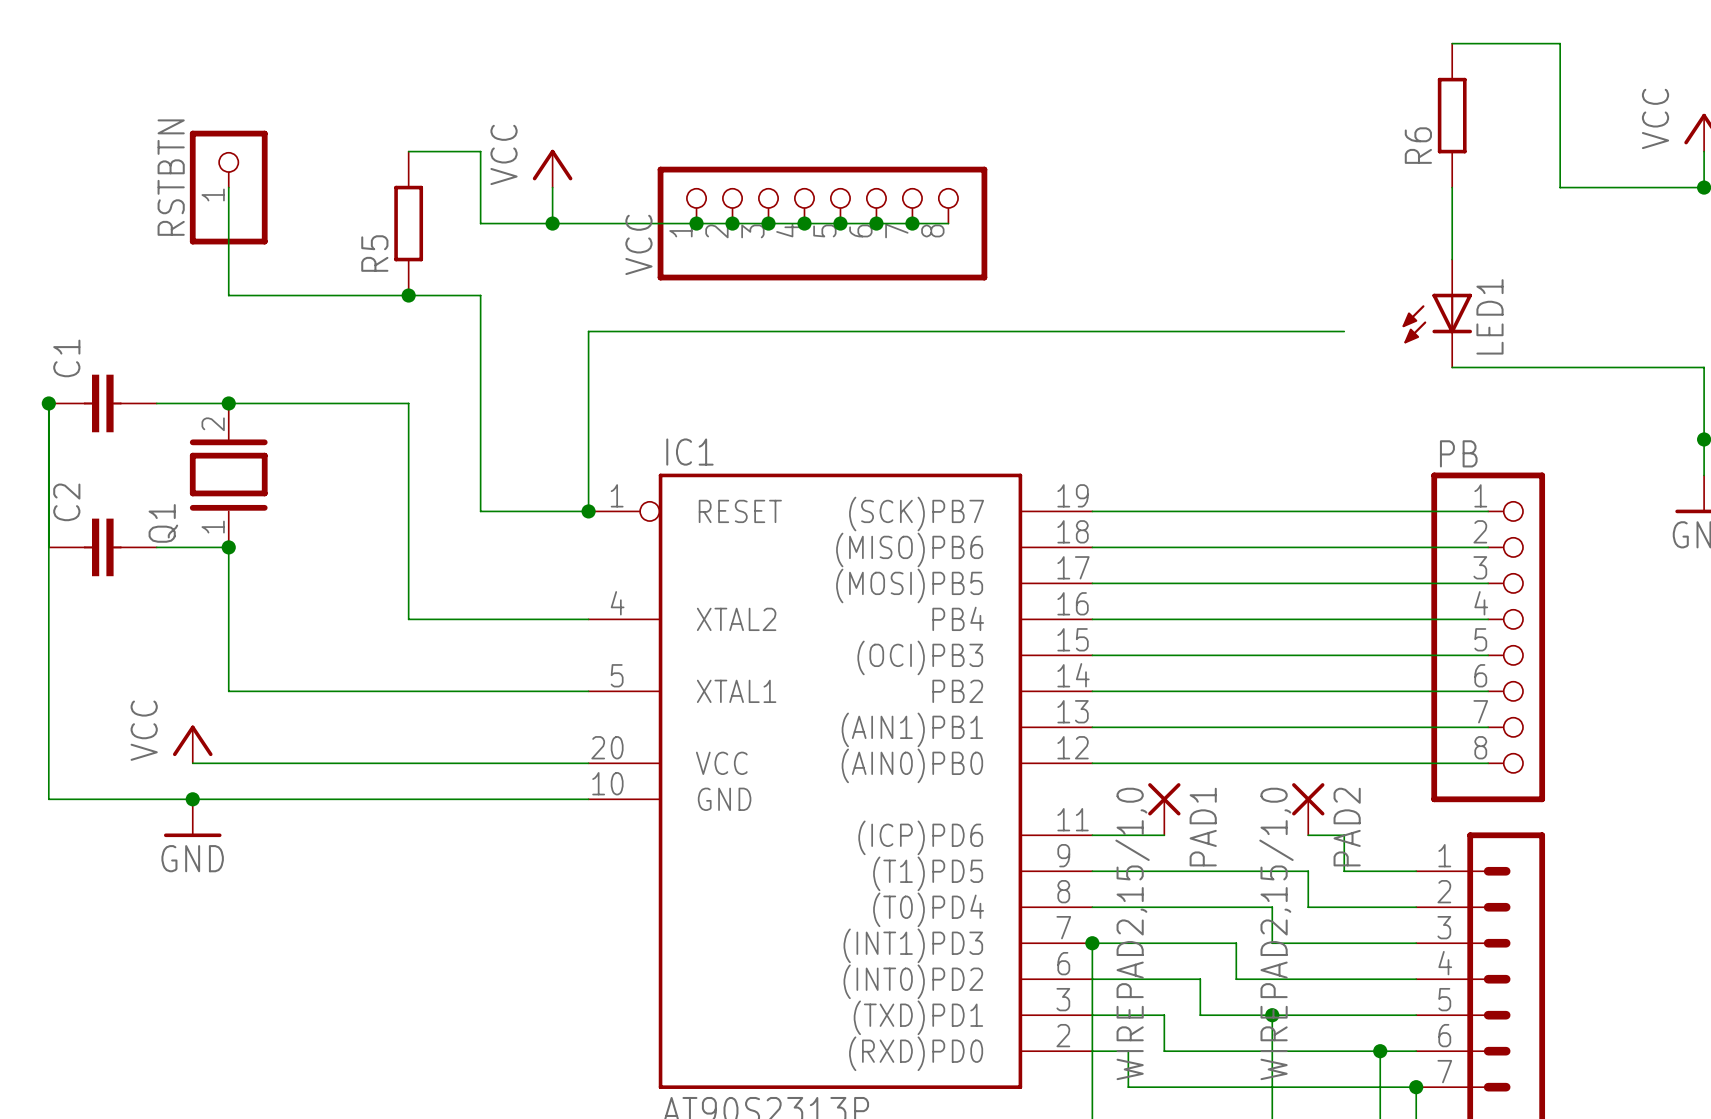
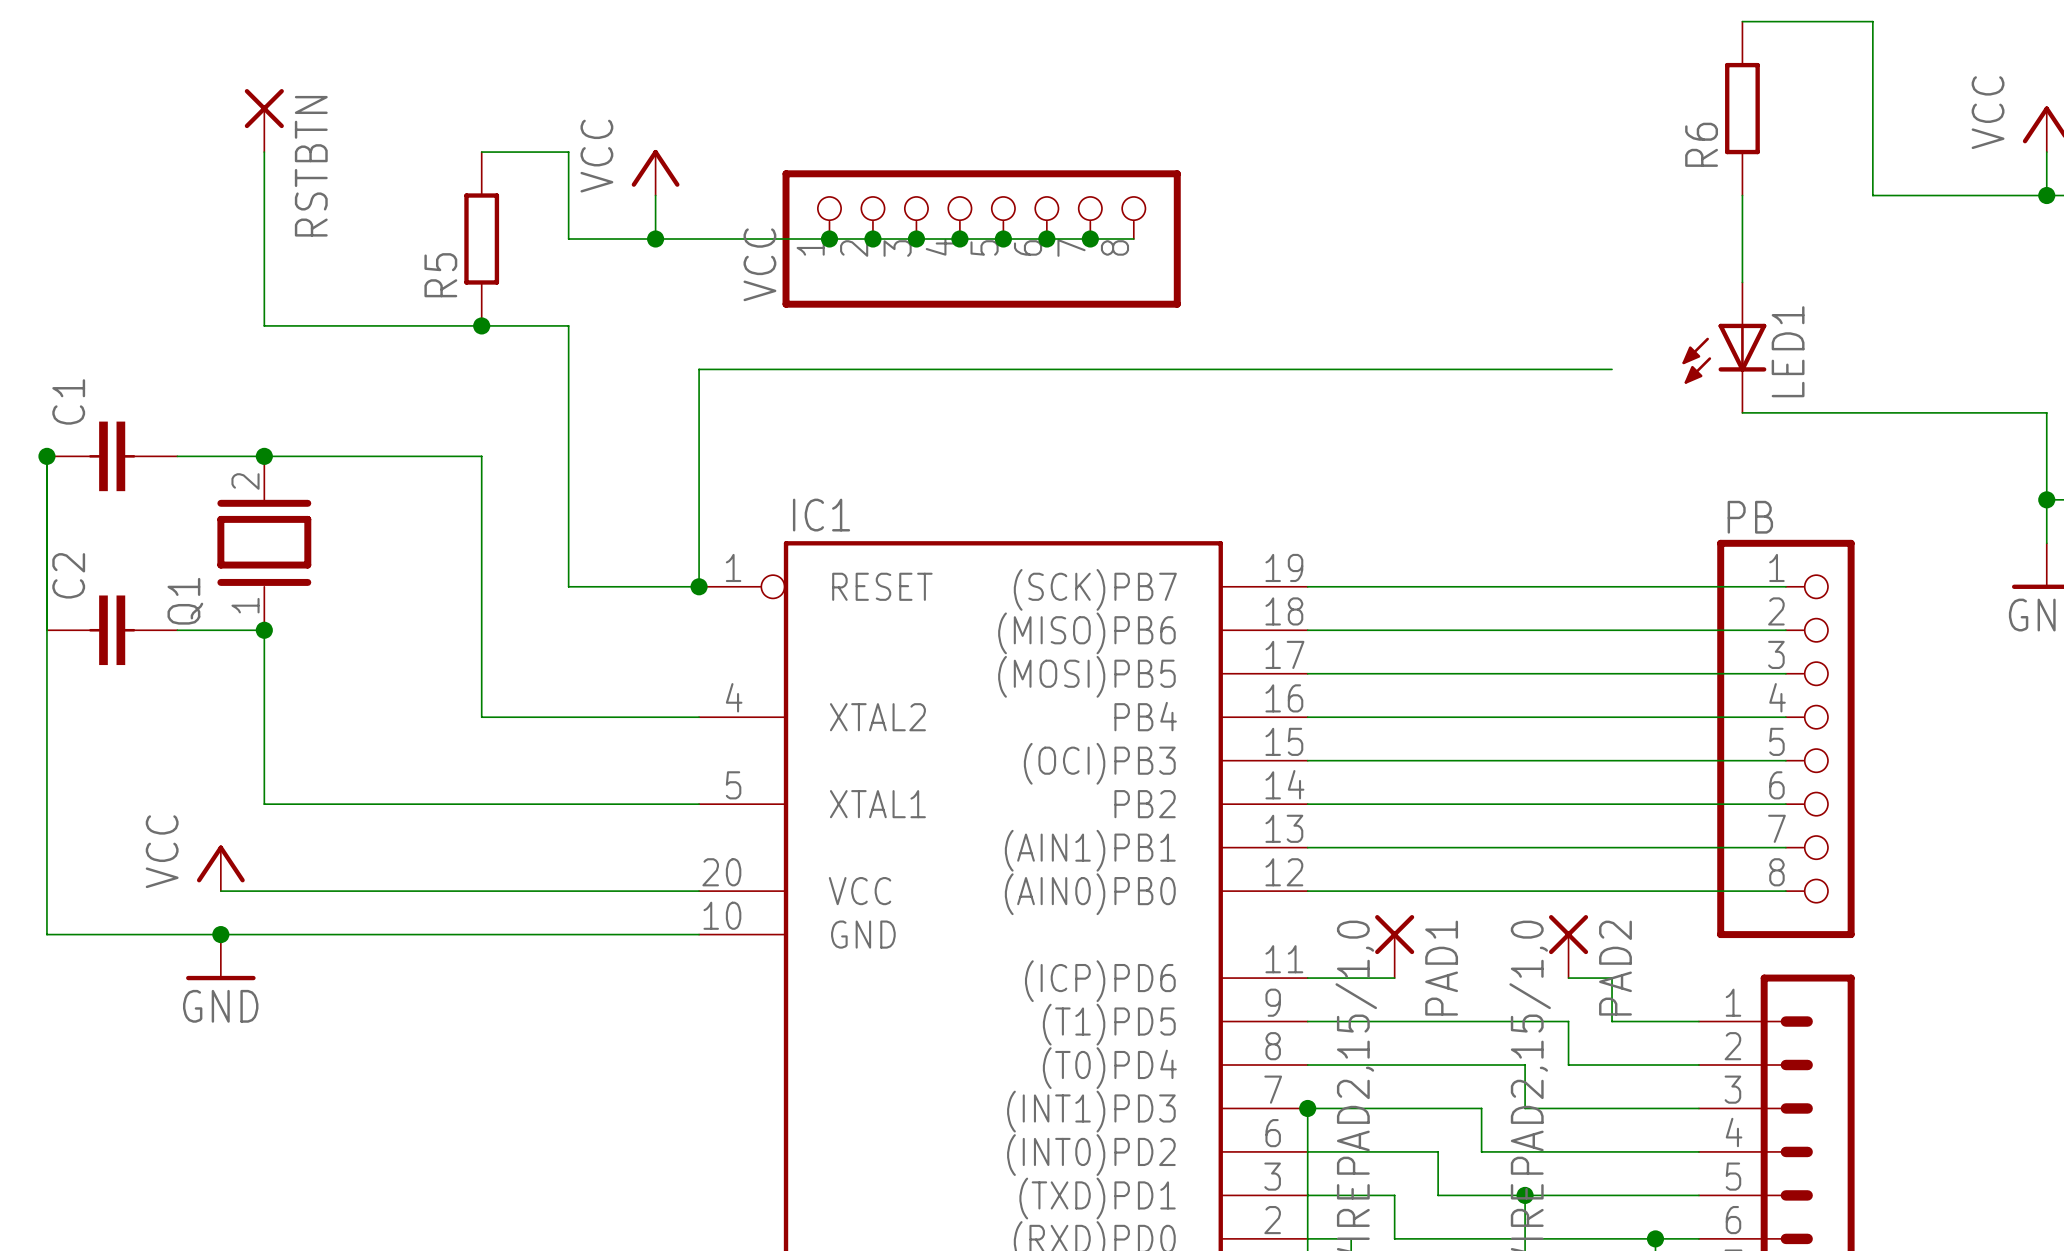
RSTBTN: none -> (264, 120)
wire: none -> (264, 152) (264, 195)
RSTBTN: (228, 187) -> none

